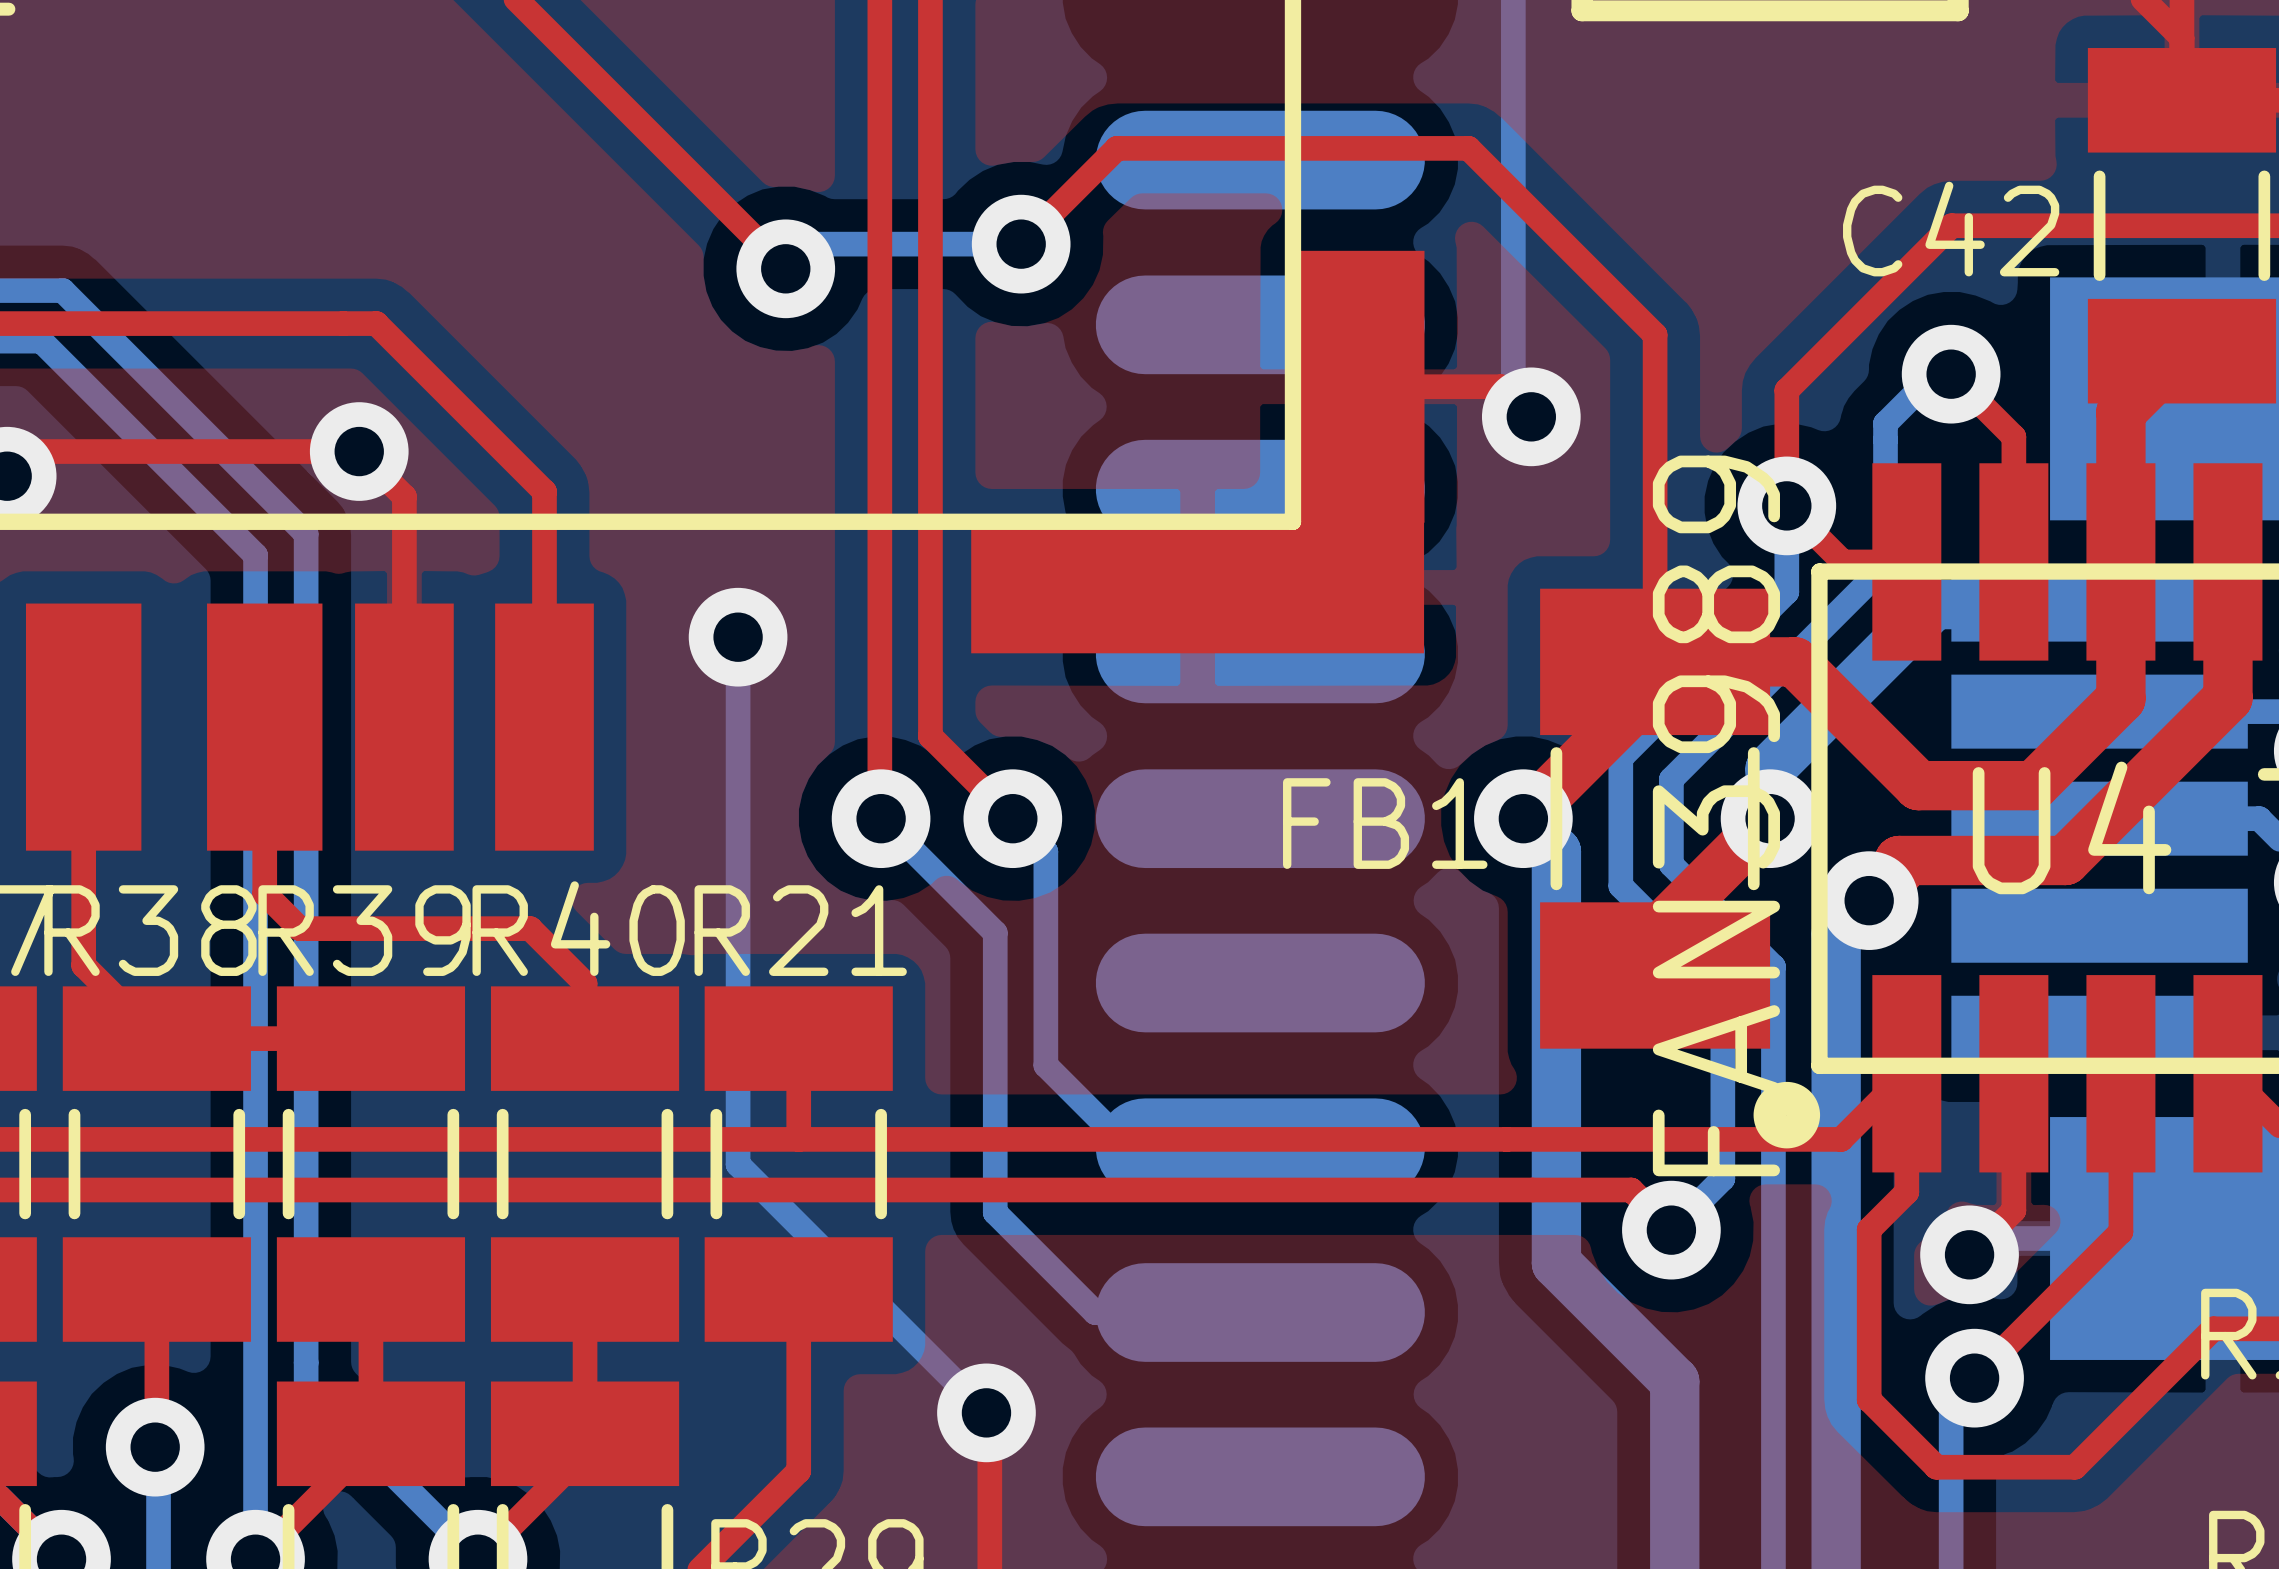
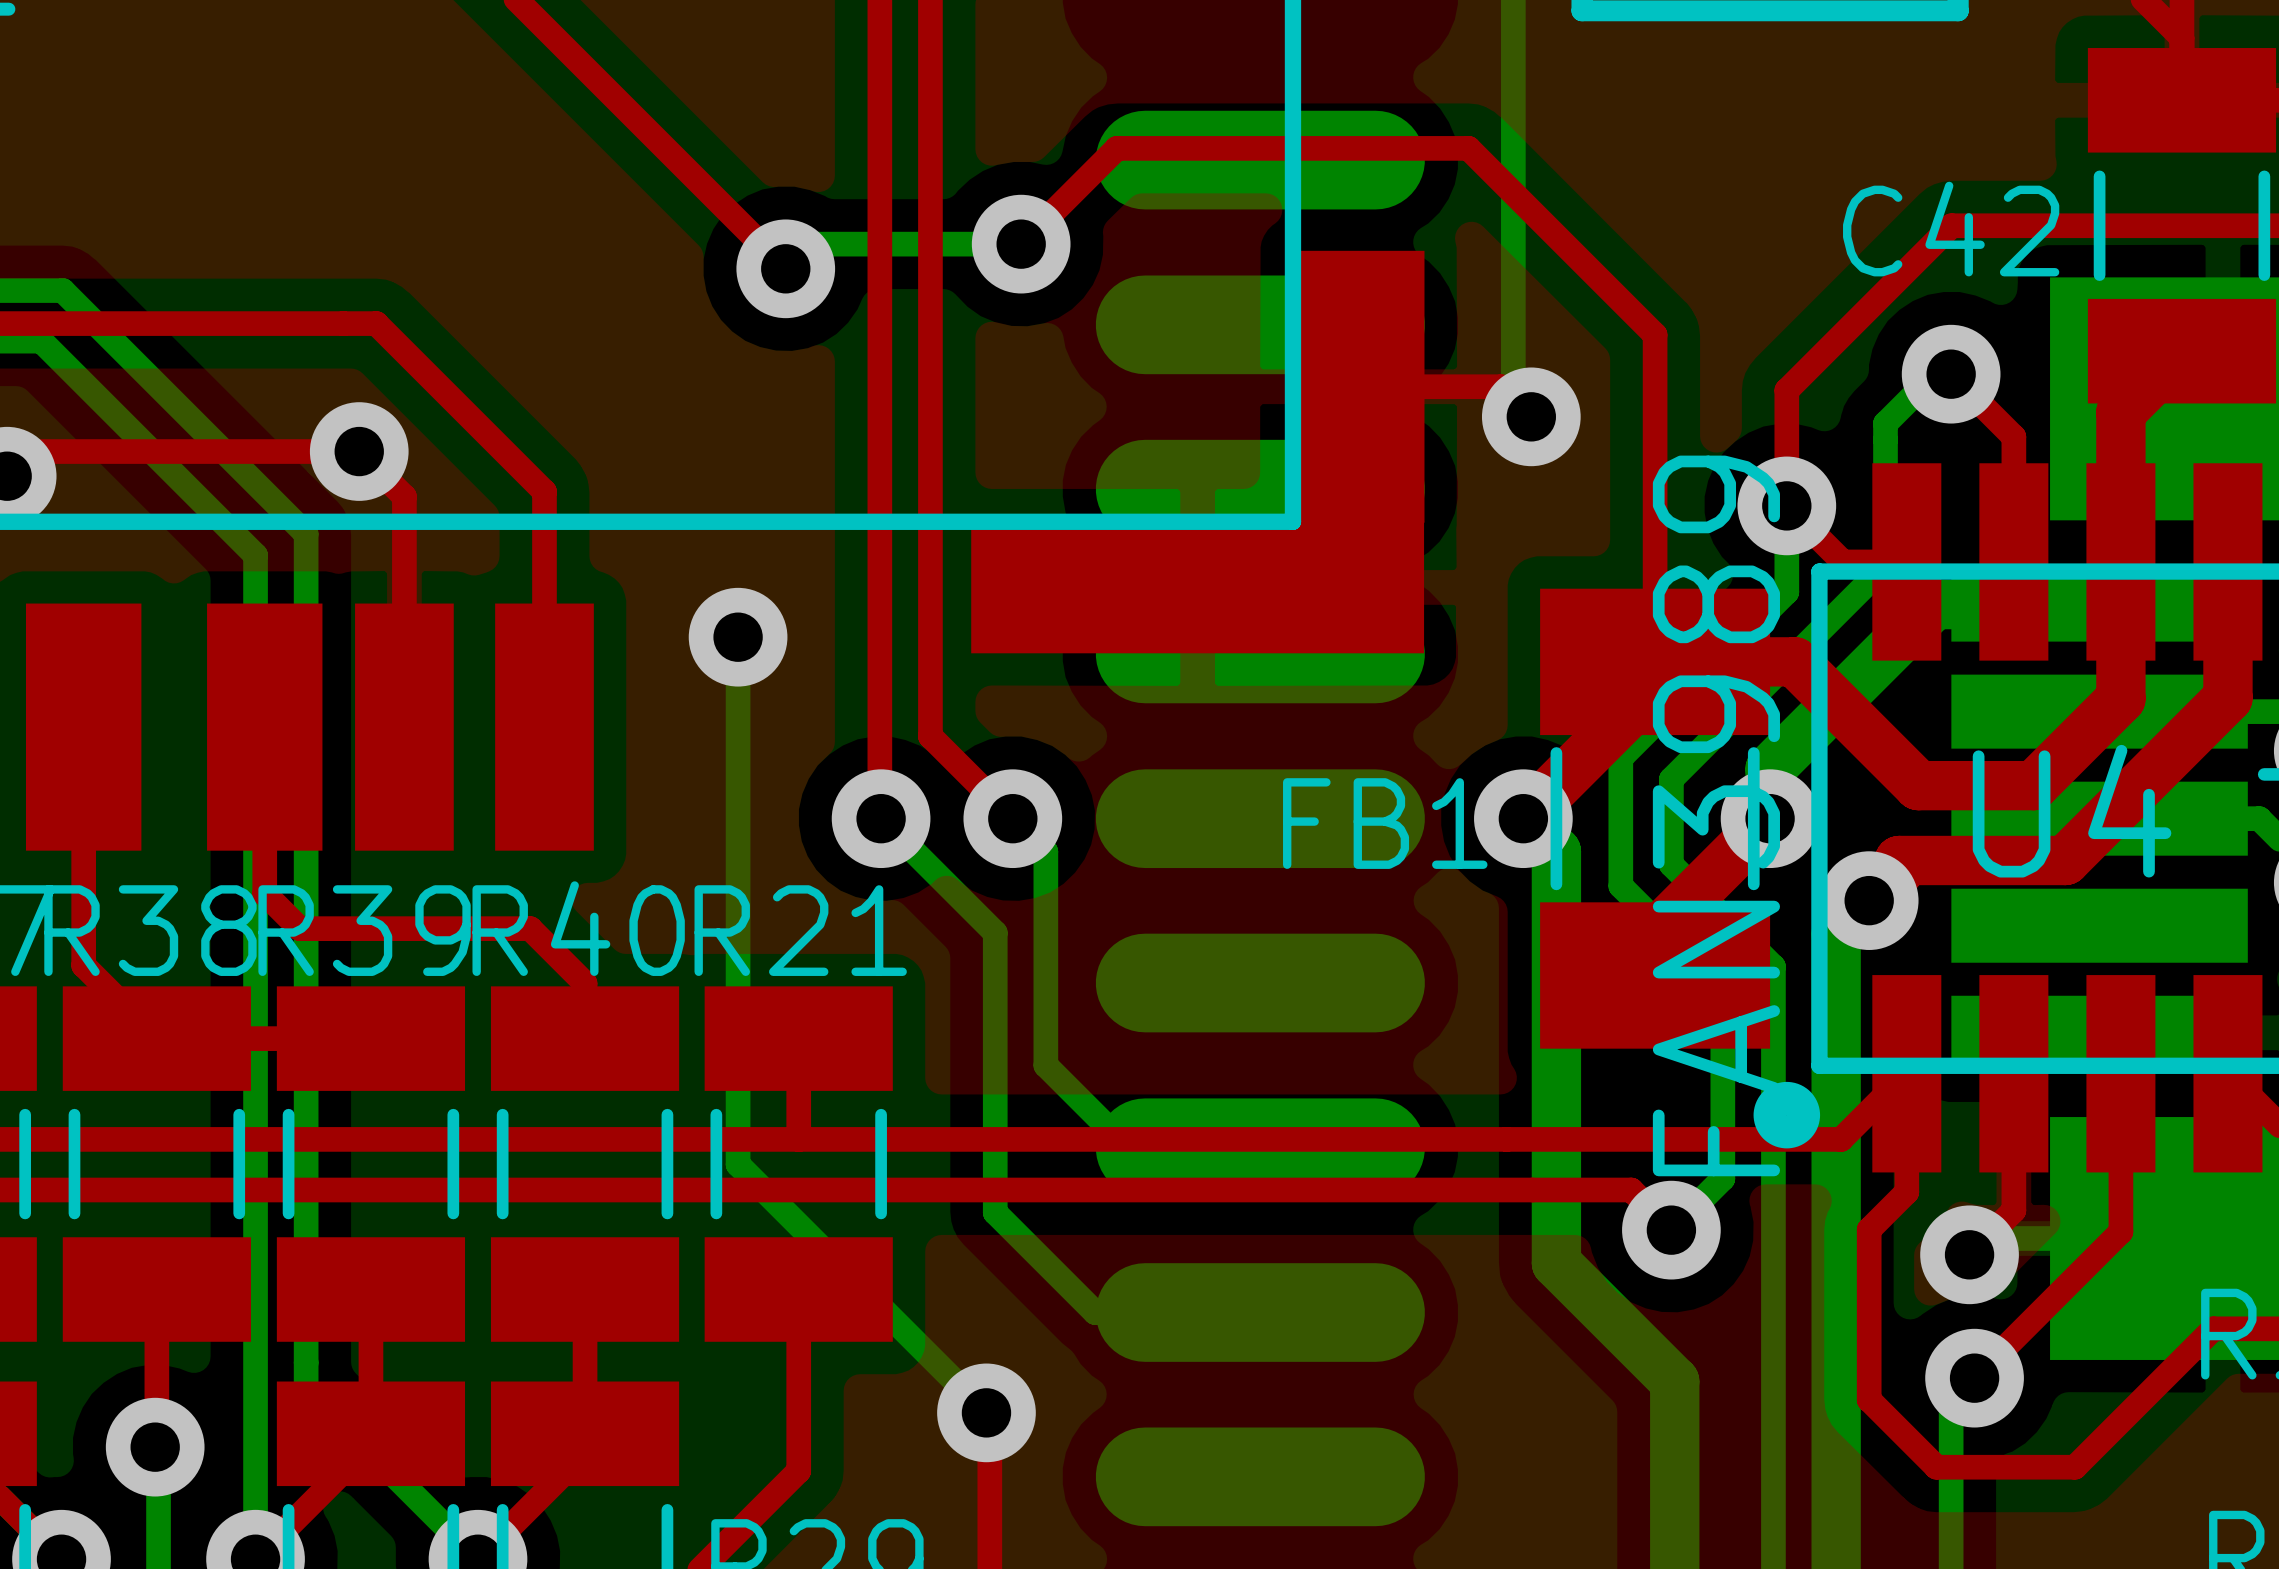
U4 name position: U4 (2072, 827) -> U4 (2072, 811)

